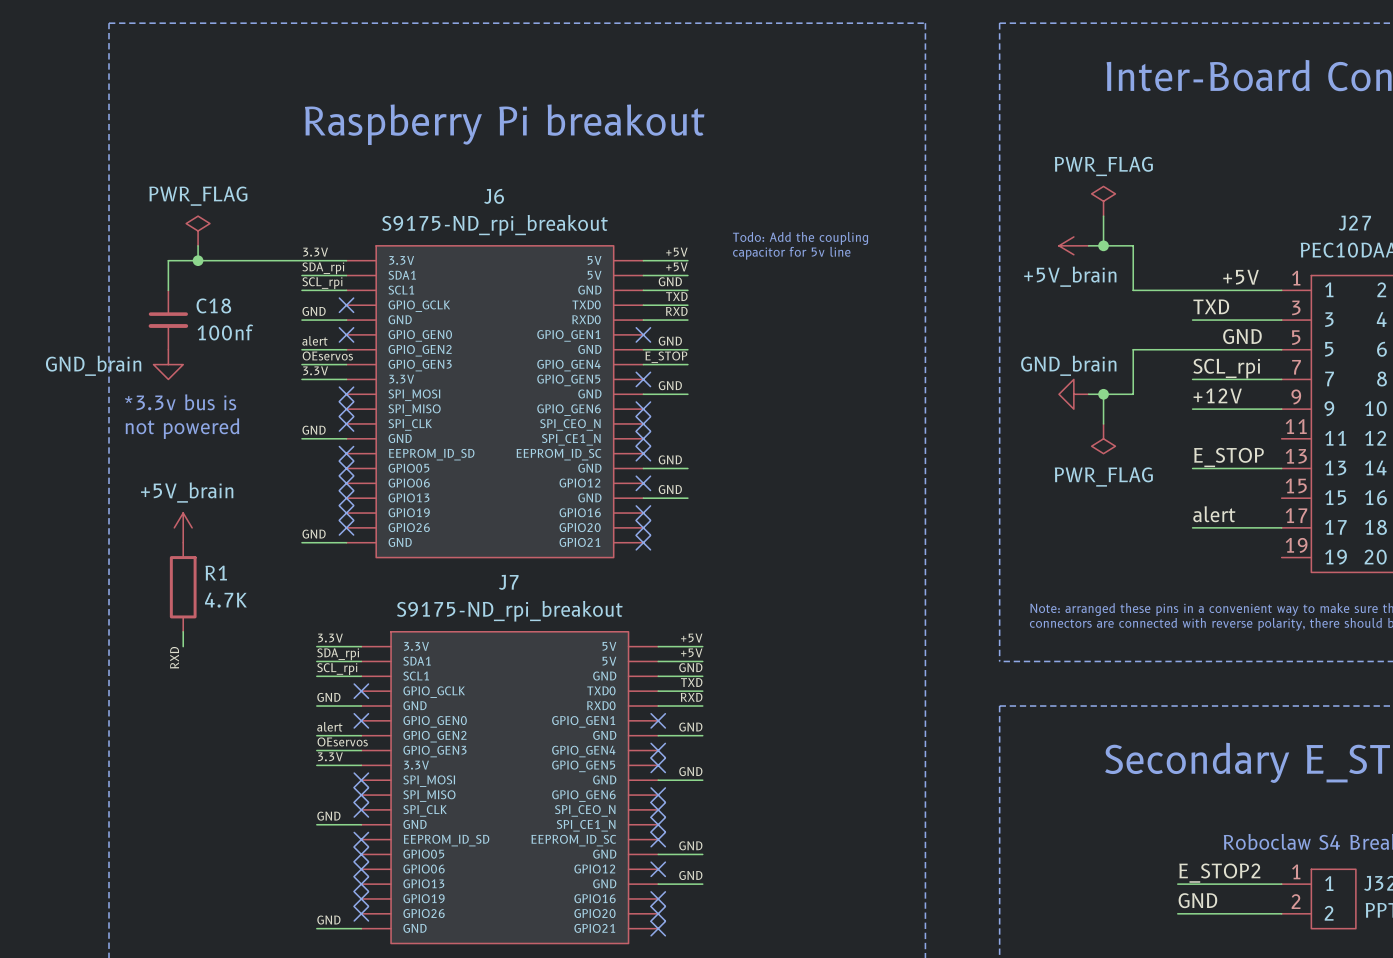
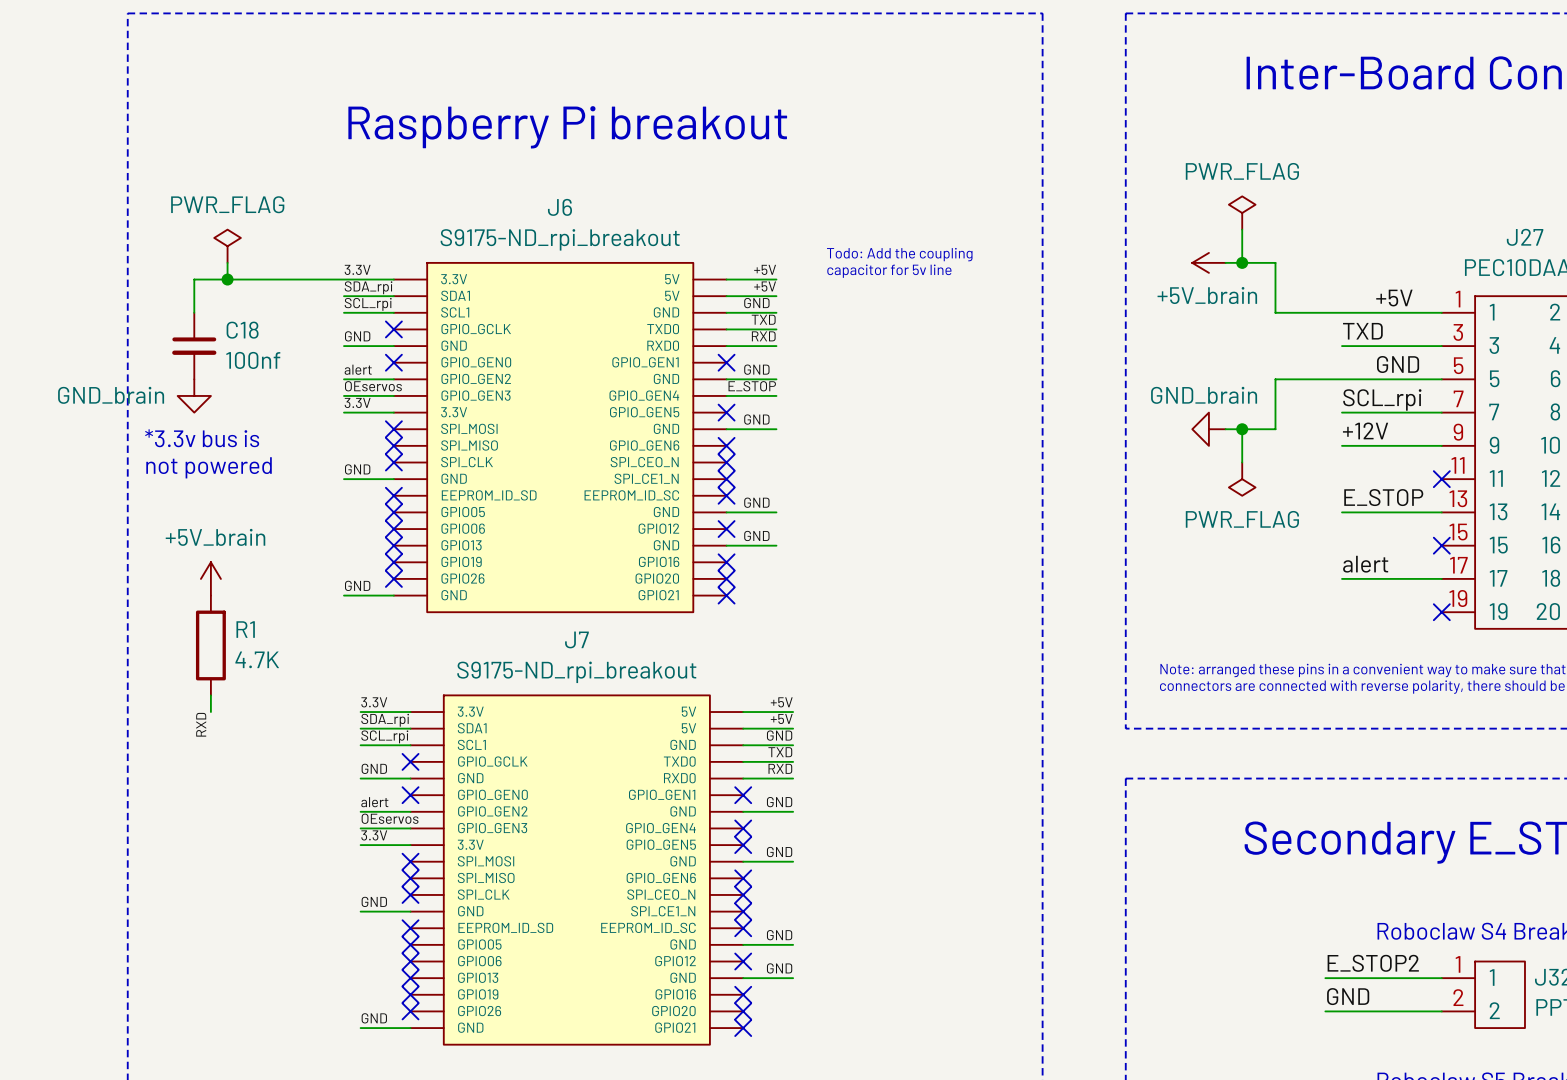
no-connect mark: none -> (1441, 479)
no-connect mark: none -> (1441, 545)
no-connect mark: none -> (1441, 612)

